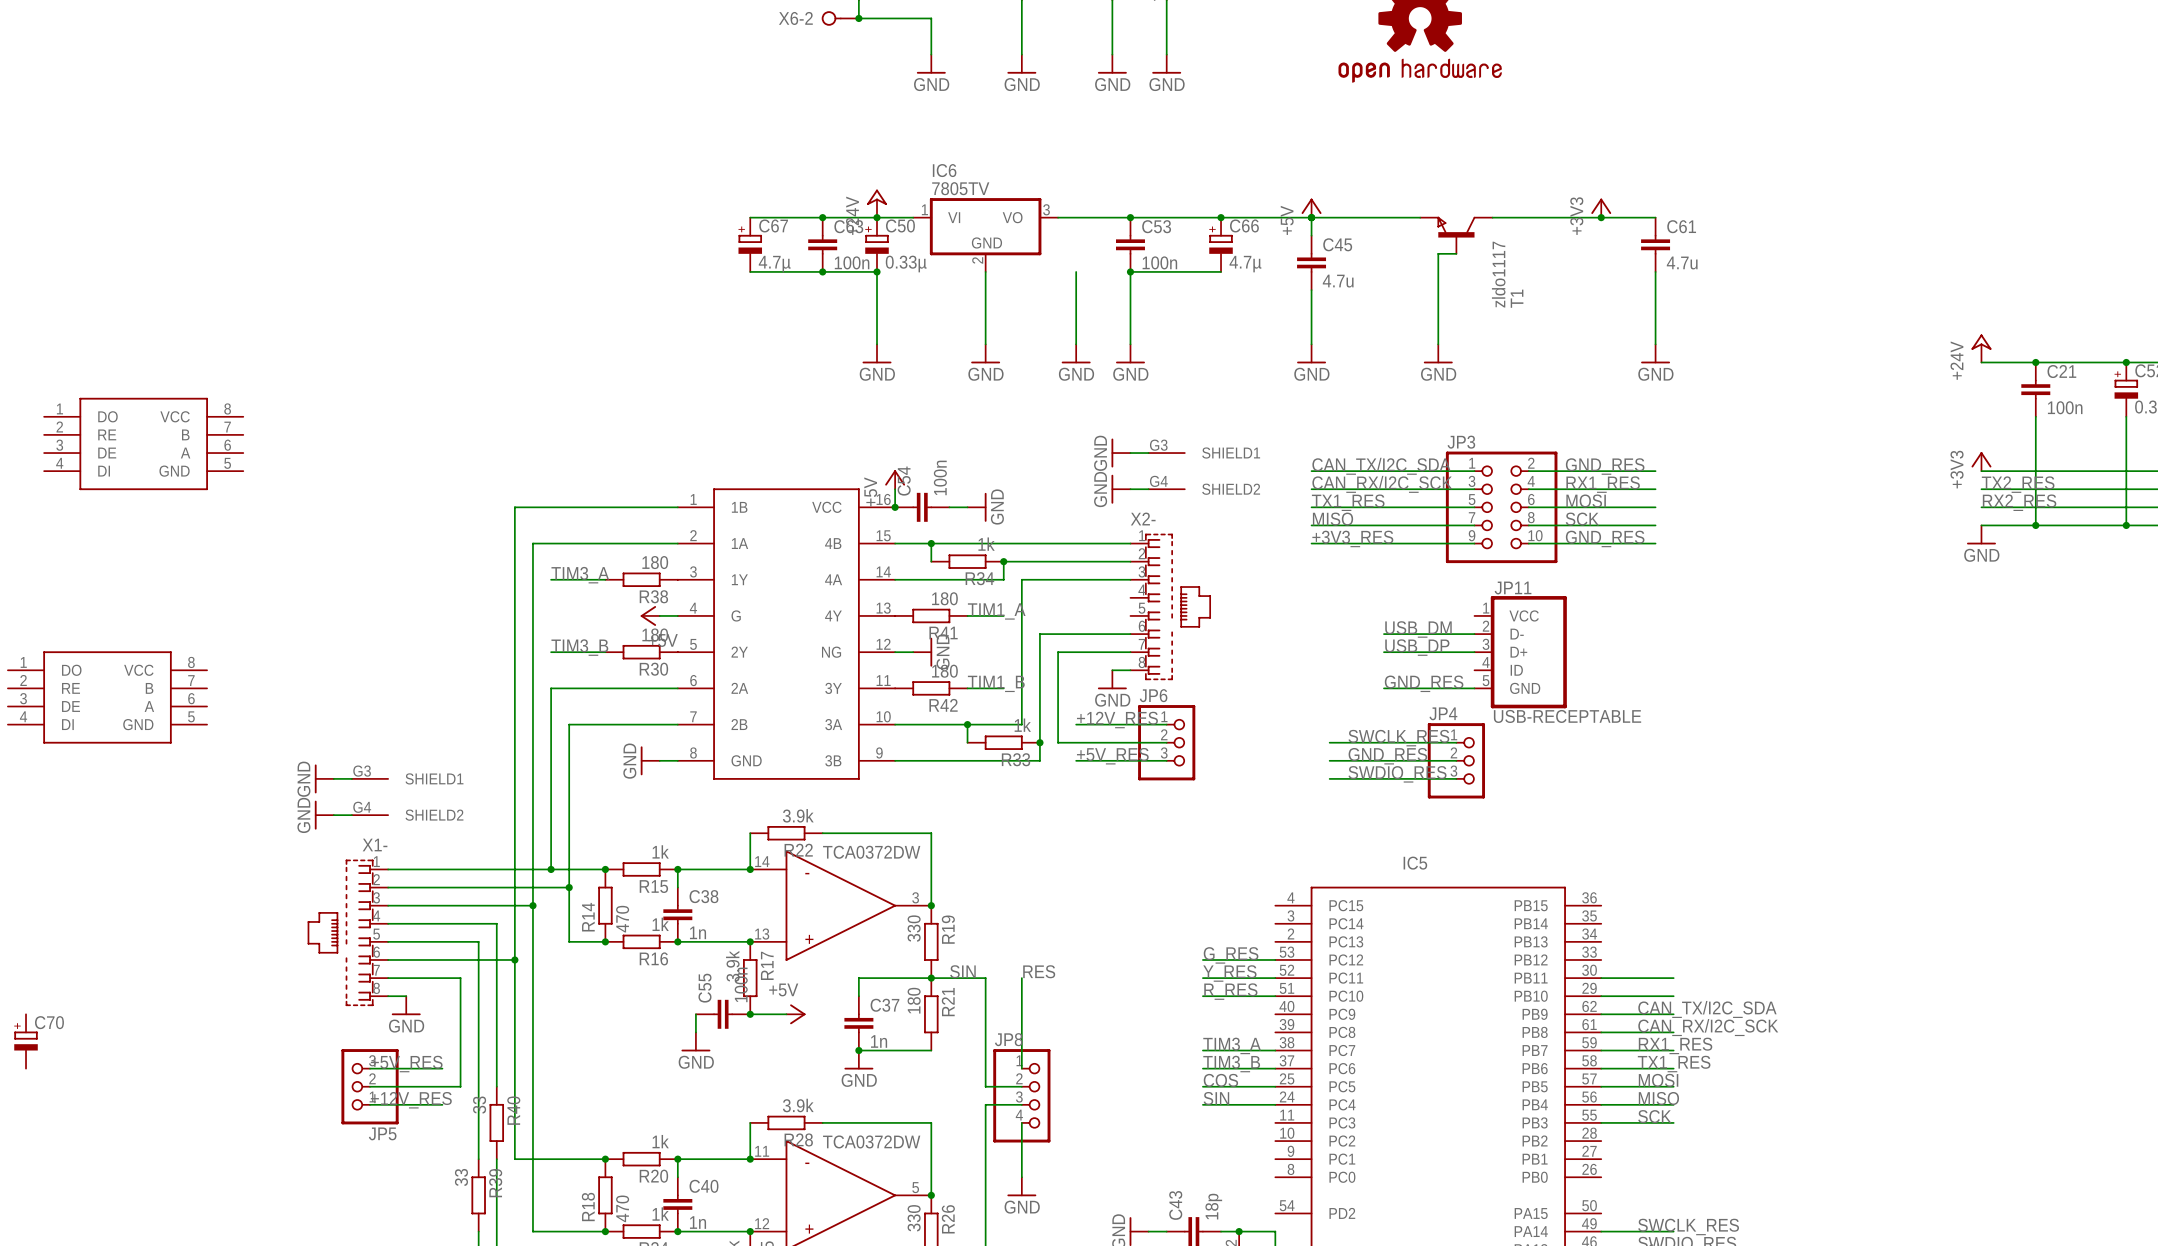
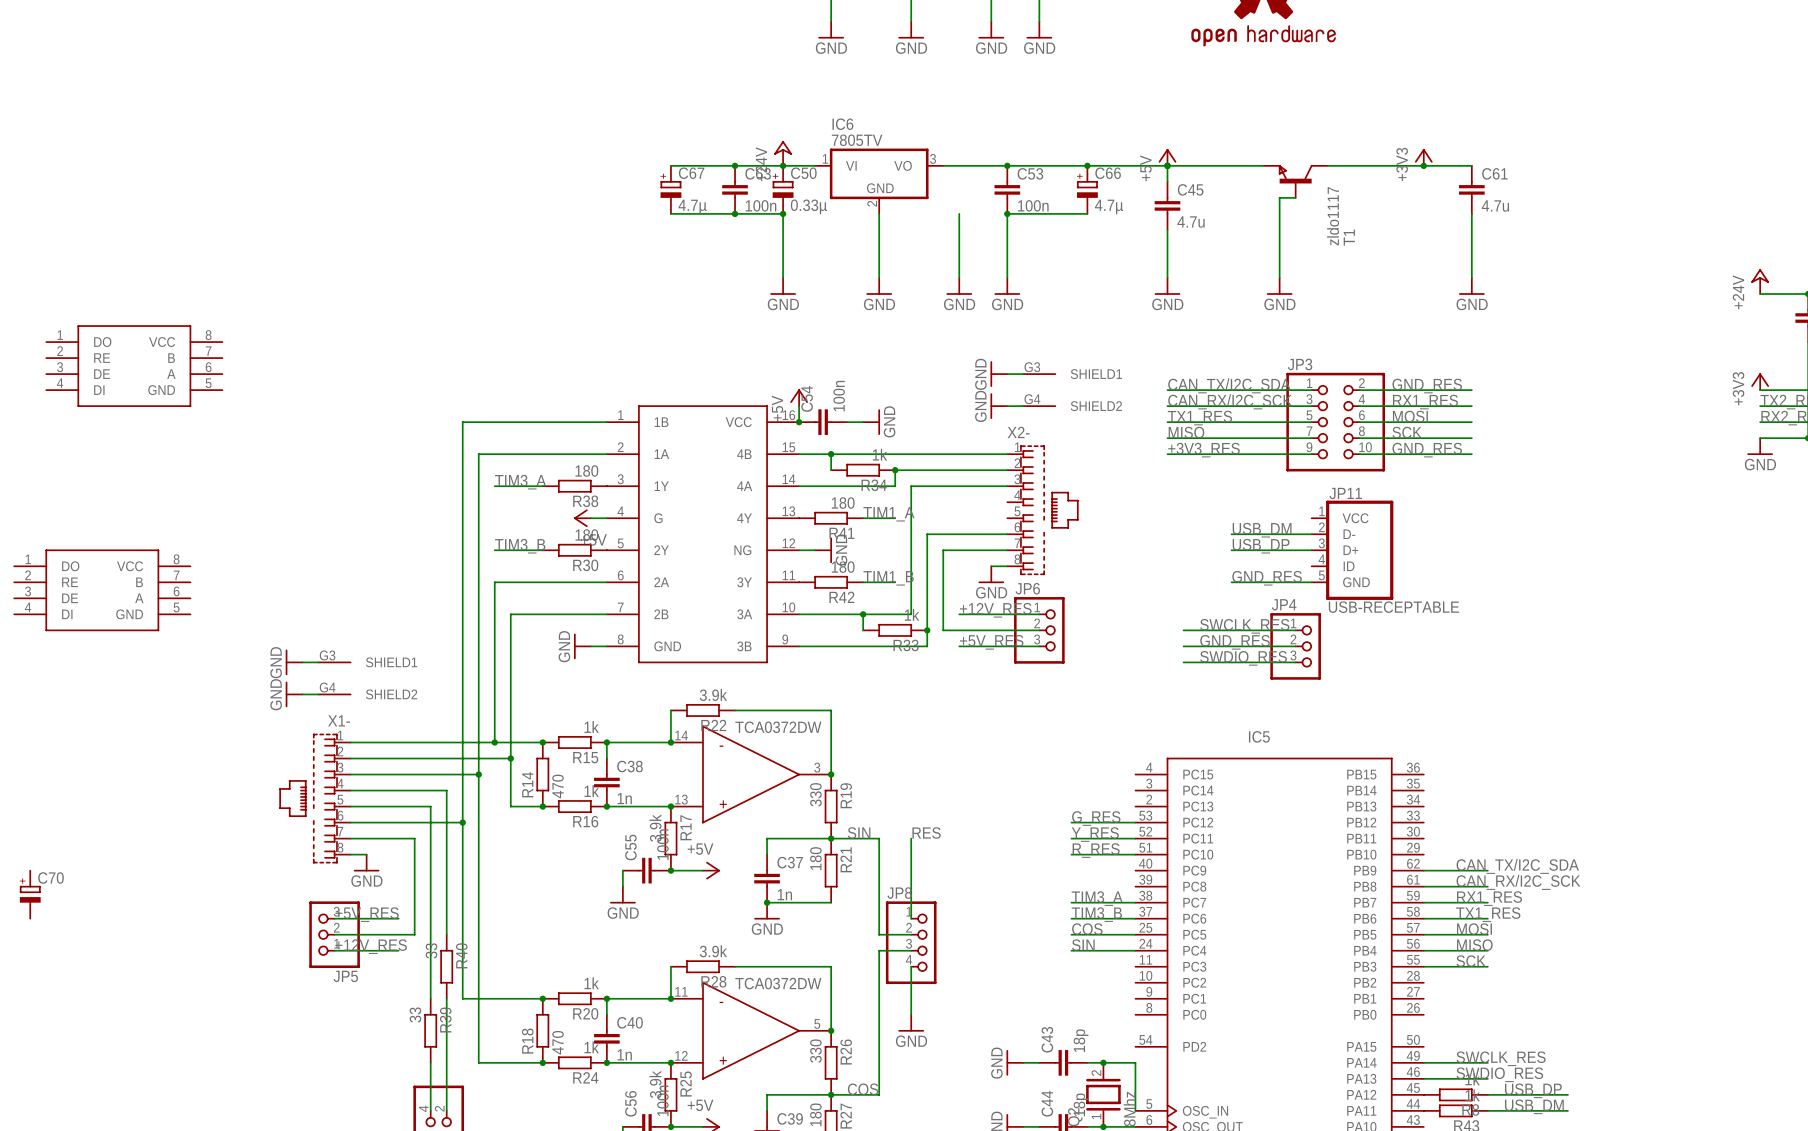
wire: (1601, 978) (1673, 978) -> none
wire: (1601, 996) (1673, 996) -> none

